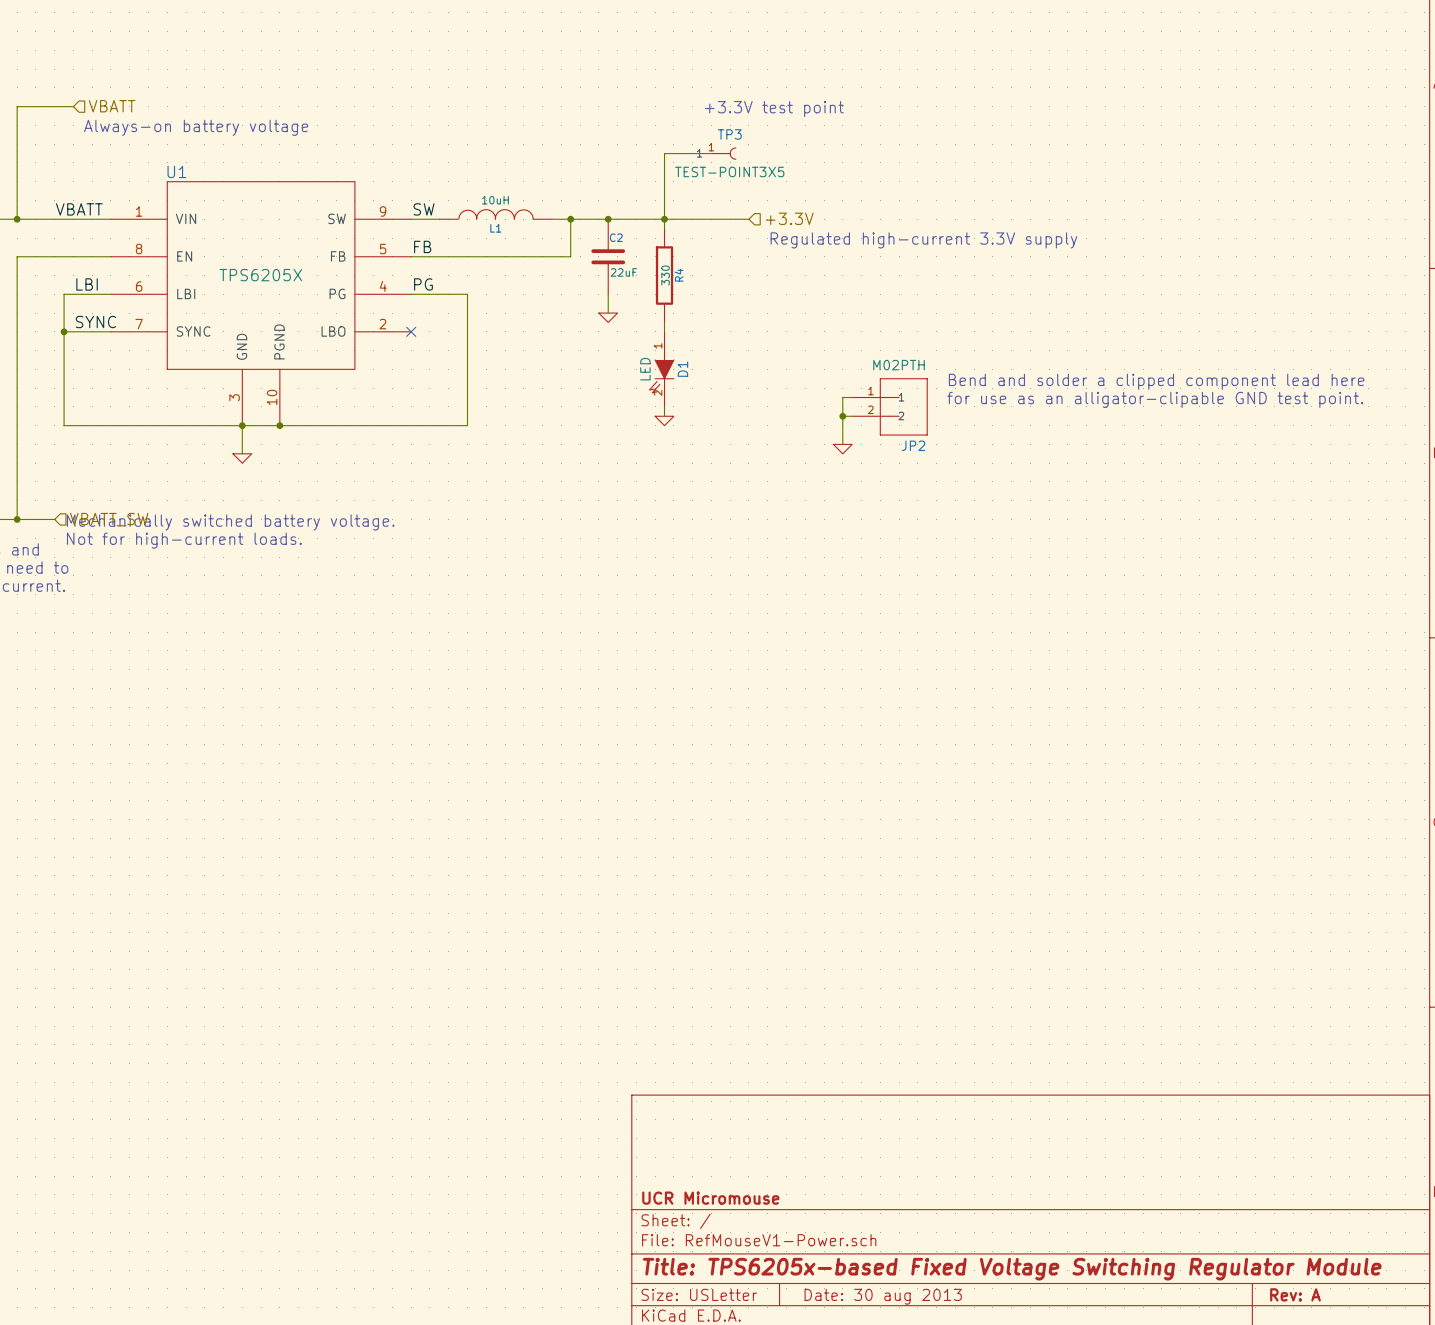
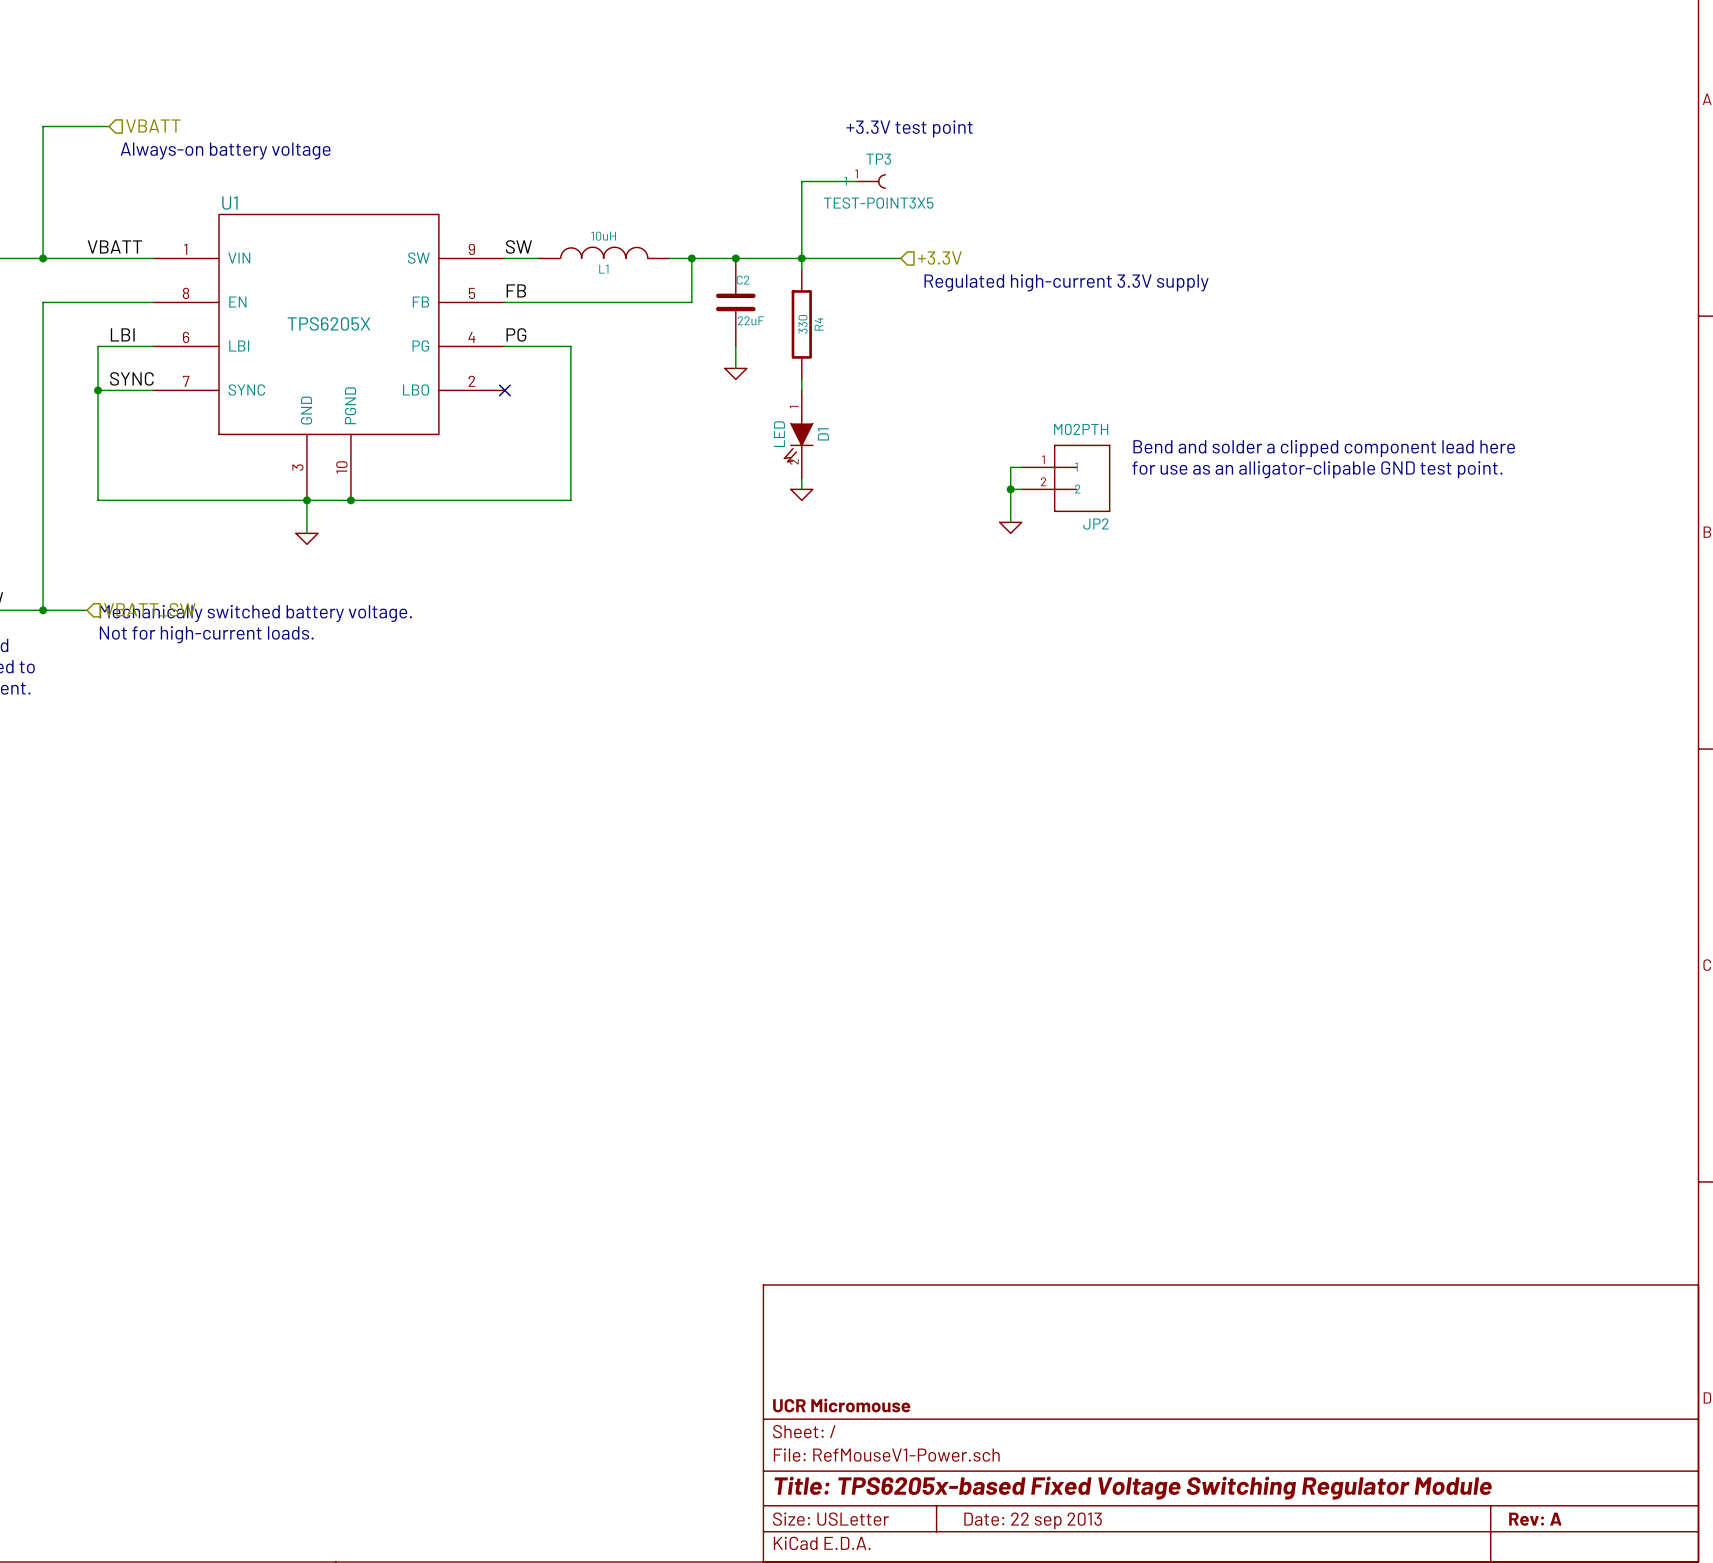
title block: Date: 30 aug 2013 (883, 1296) -> Date: 22 sep 2013 (1033, 1520)

